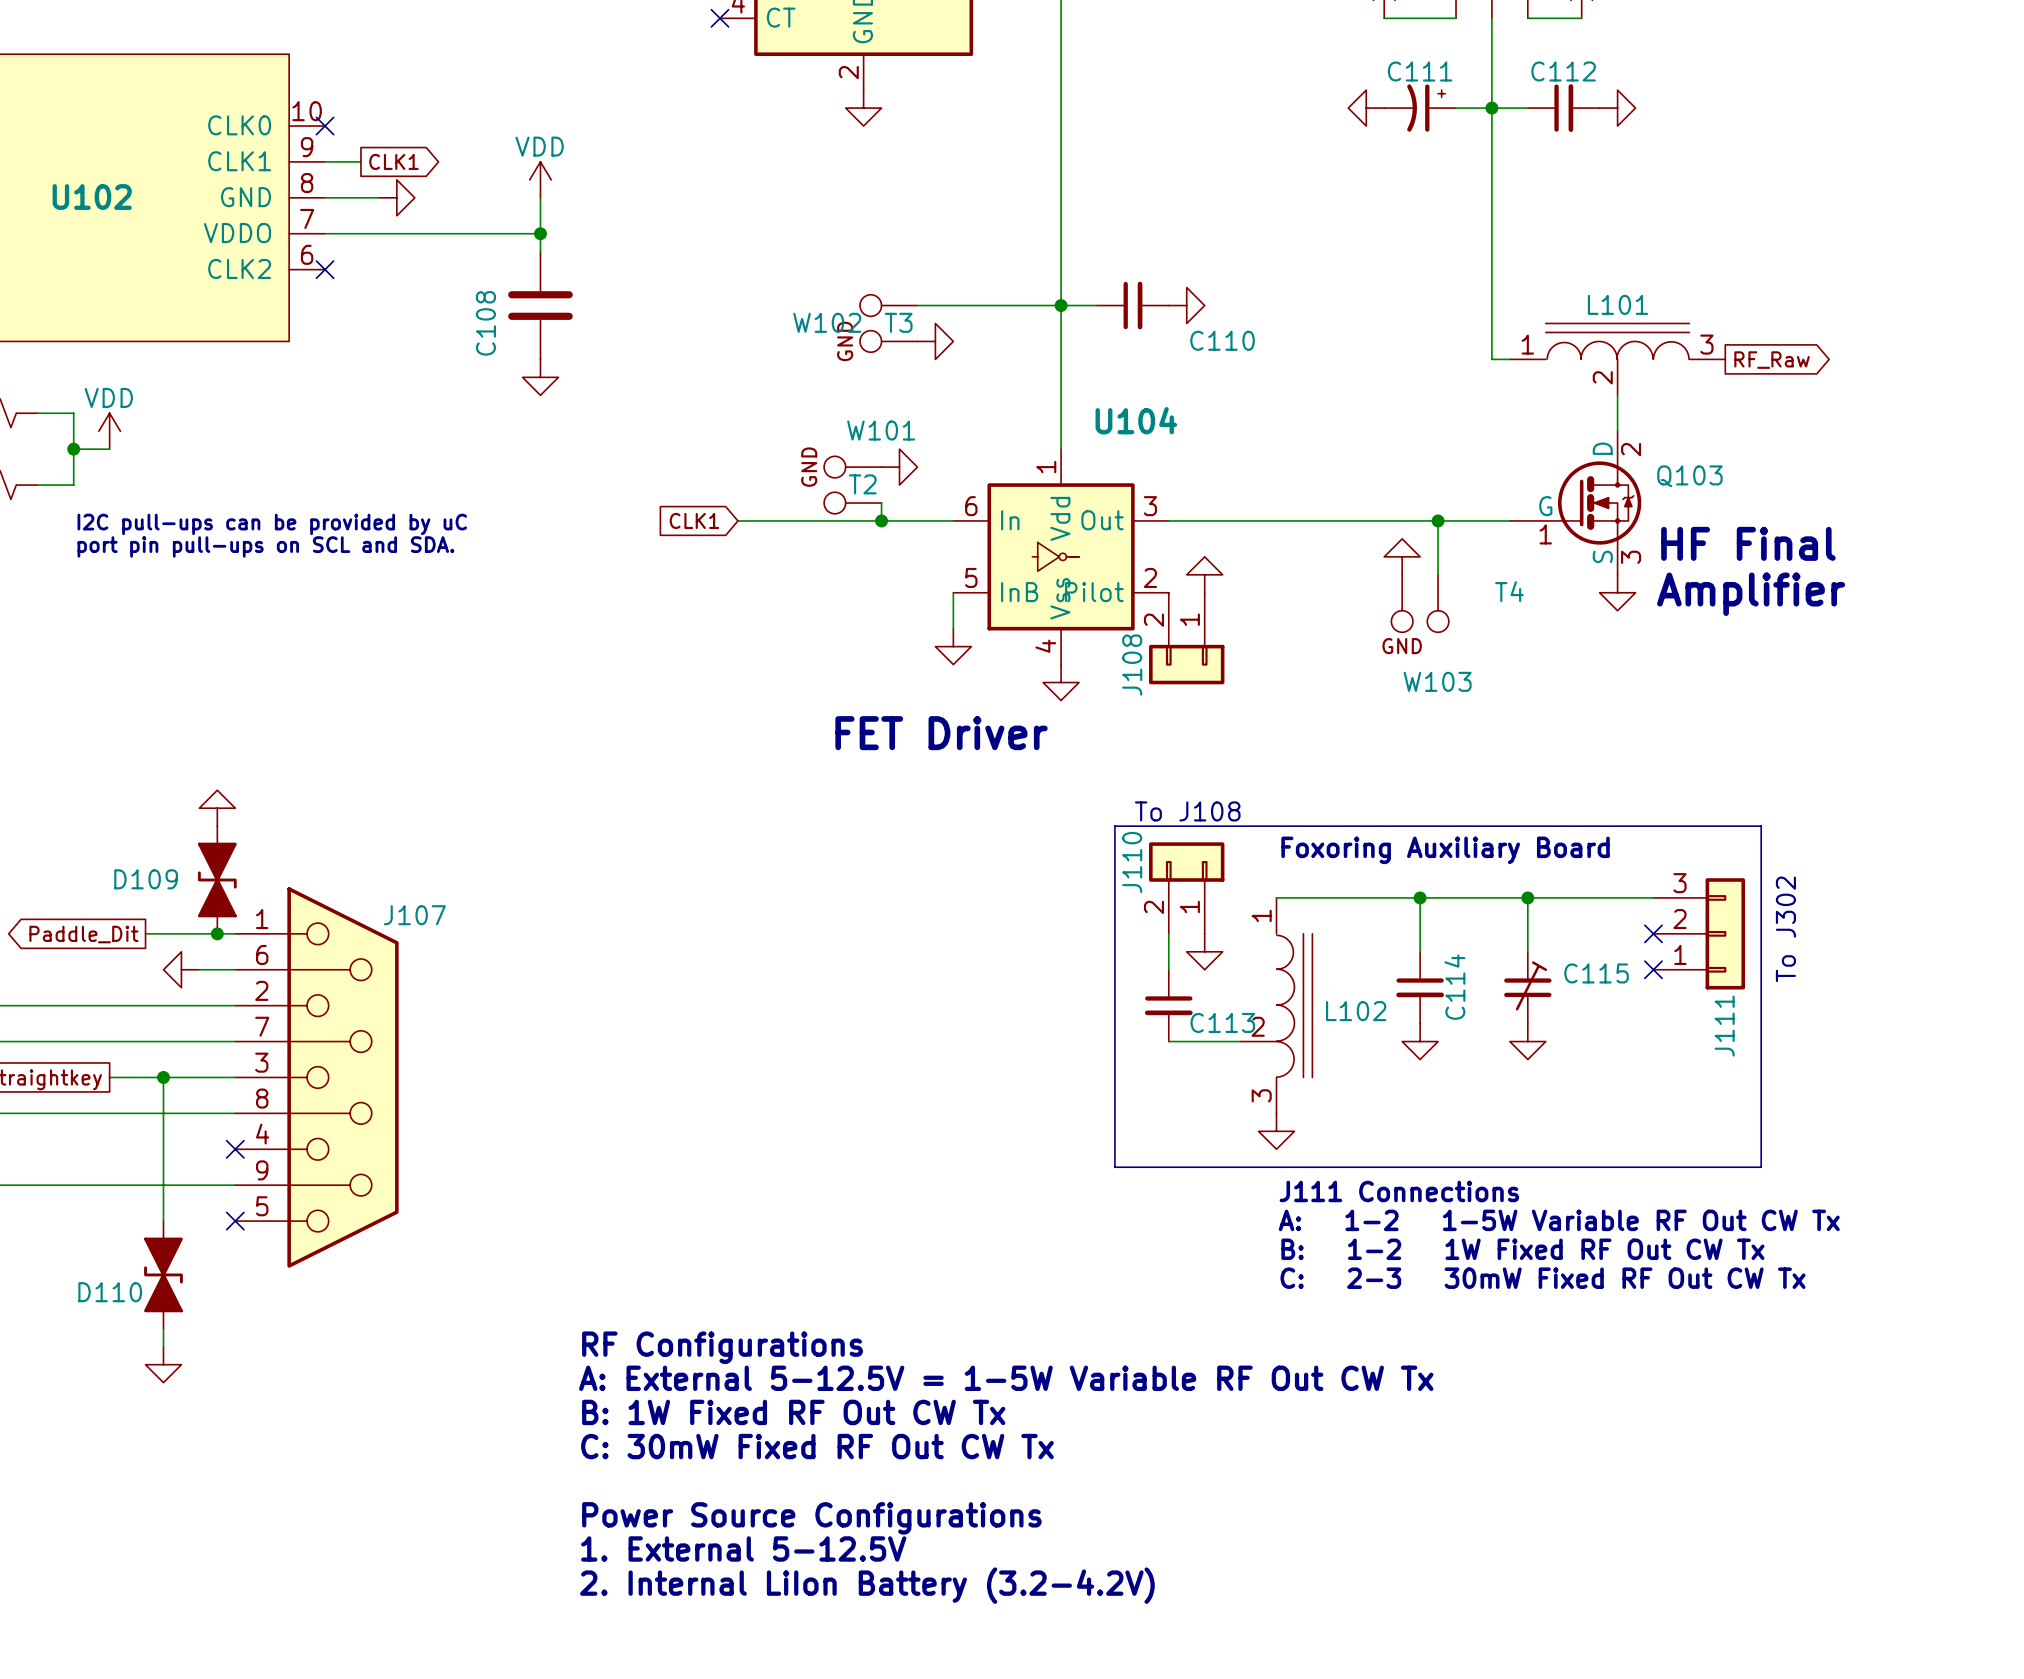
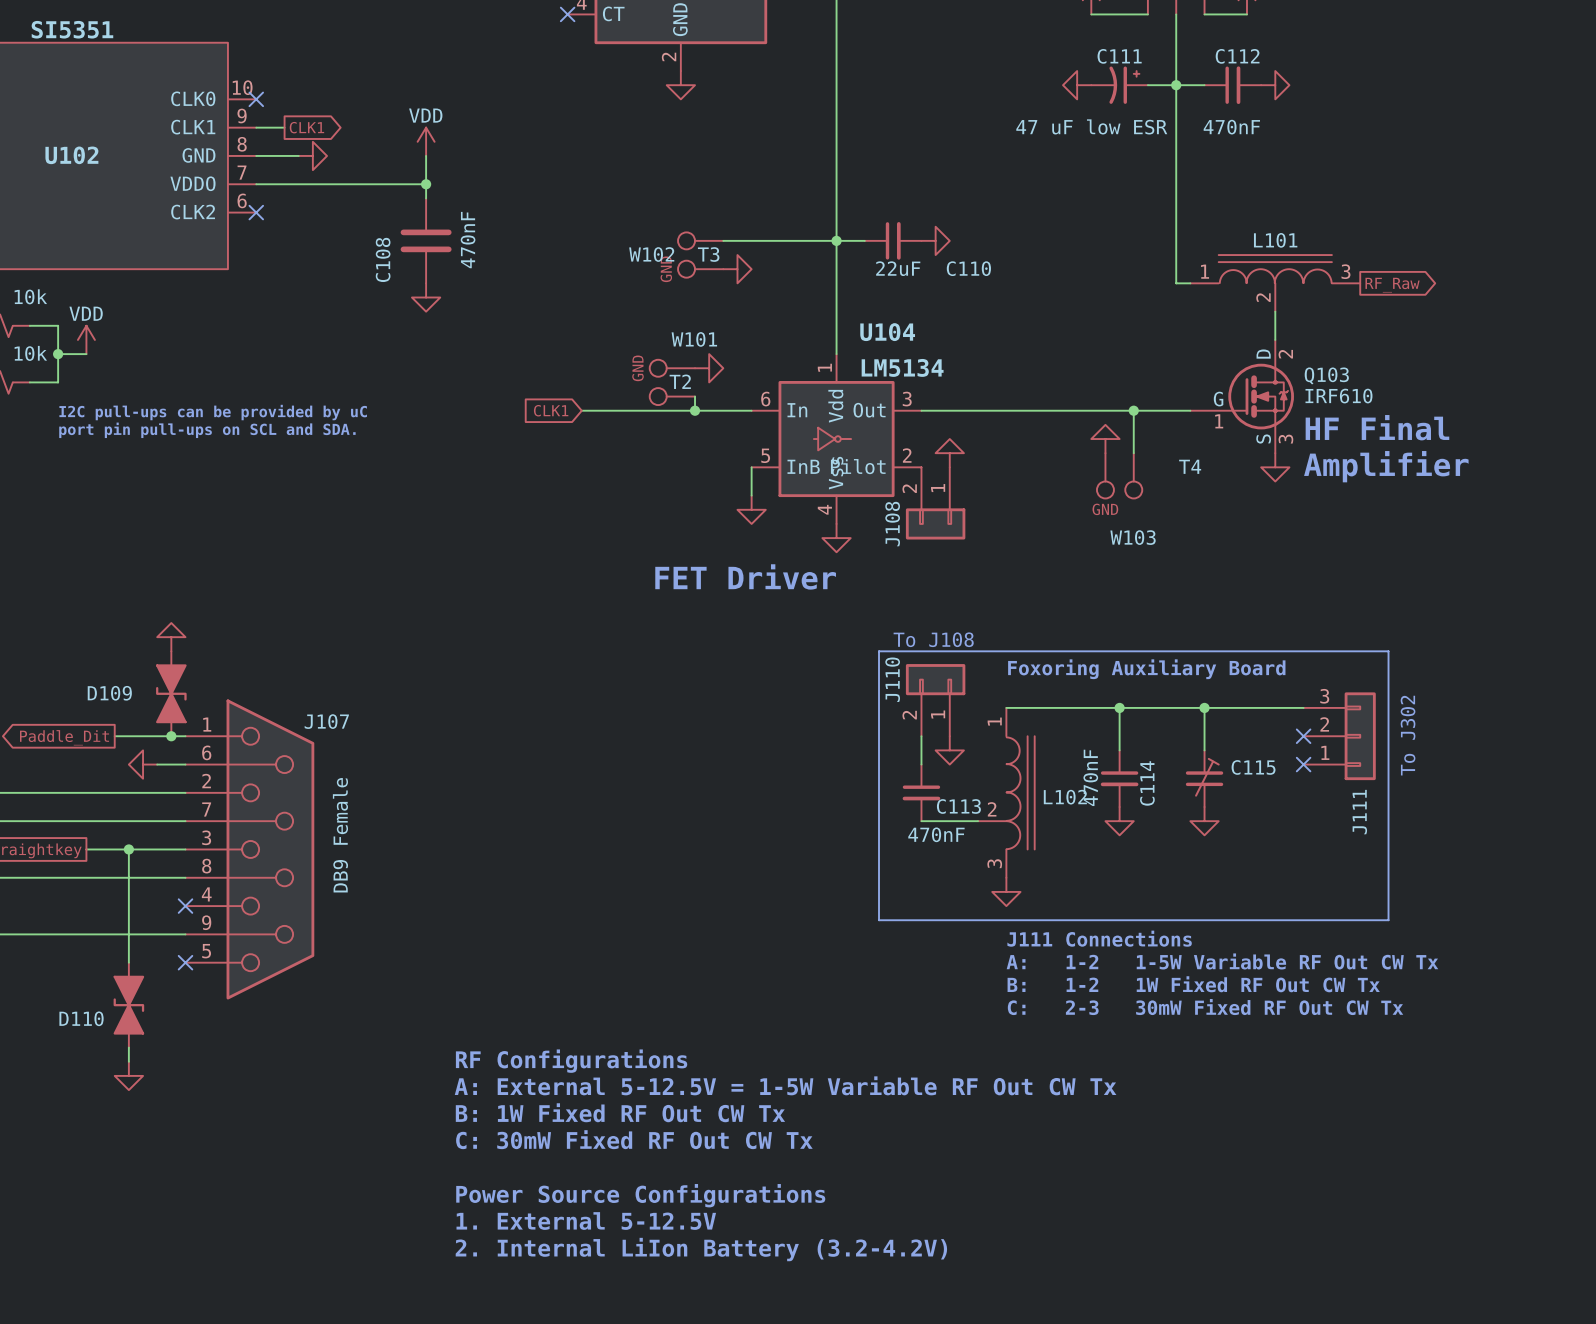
U102 value: none -> SI5351 (72, 29)
C111 value: none -> 47 uF low ESR (1091, 126)
C112 value: none -> 470nF (1231, 127)
C108 value: none -> 470nF (468, 240)
C110 value: none -> 22uF (898, 268)
part value: none -> 10k (30, 296)
part value: none -> 10k (30, 353)
U104 value: none -> LM5134 (902, 367)
Q103 value: none -> IRF610 (1338, 396)
C114 value: none -> 470nF (1090, 777)
C113 value: none -> 470nF (936, 834)
J107 value: none -> DB9 Female (340, 835)

